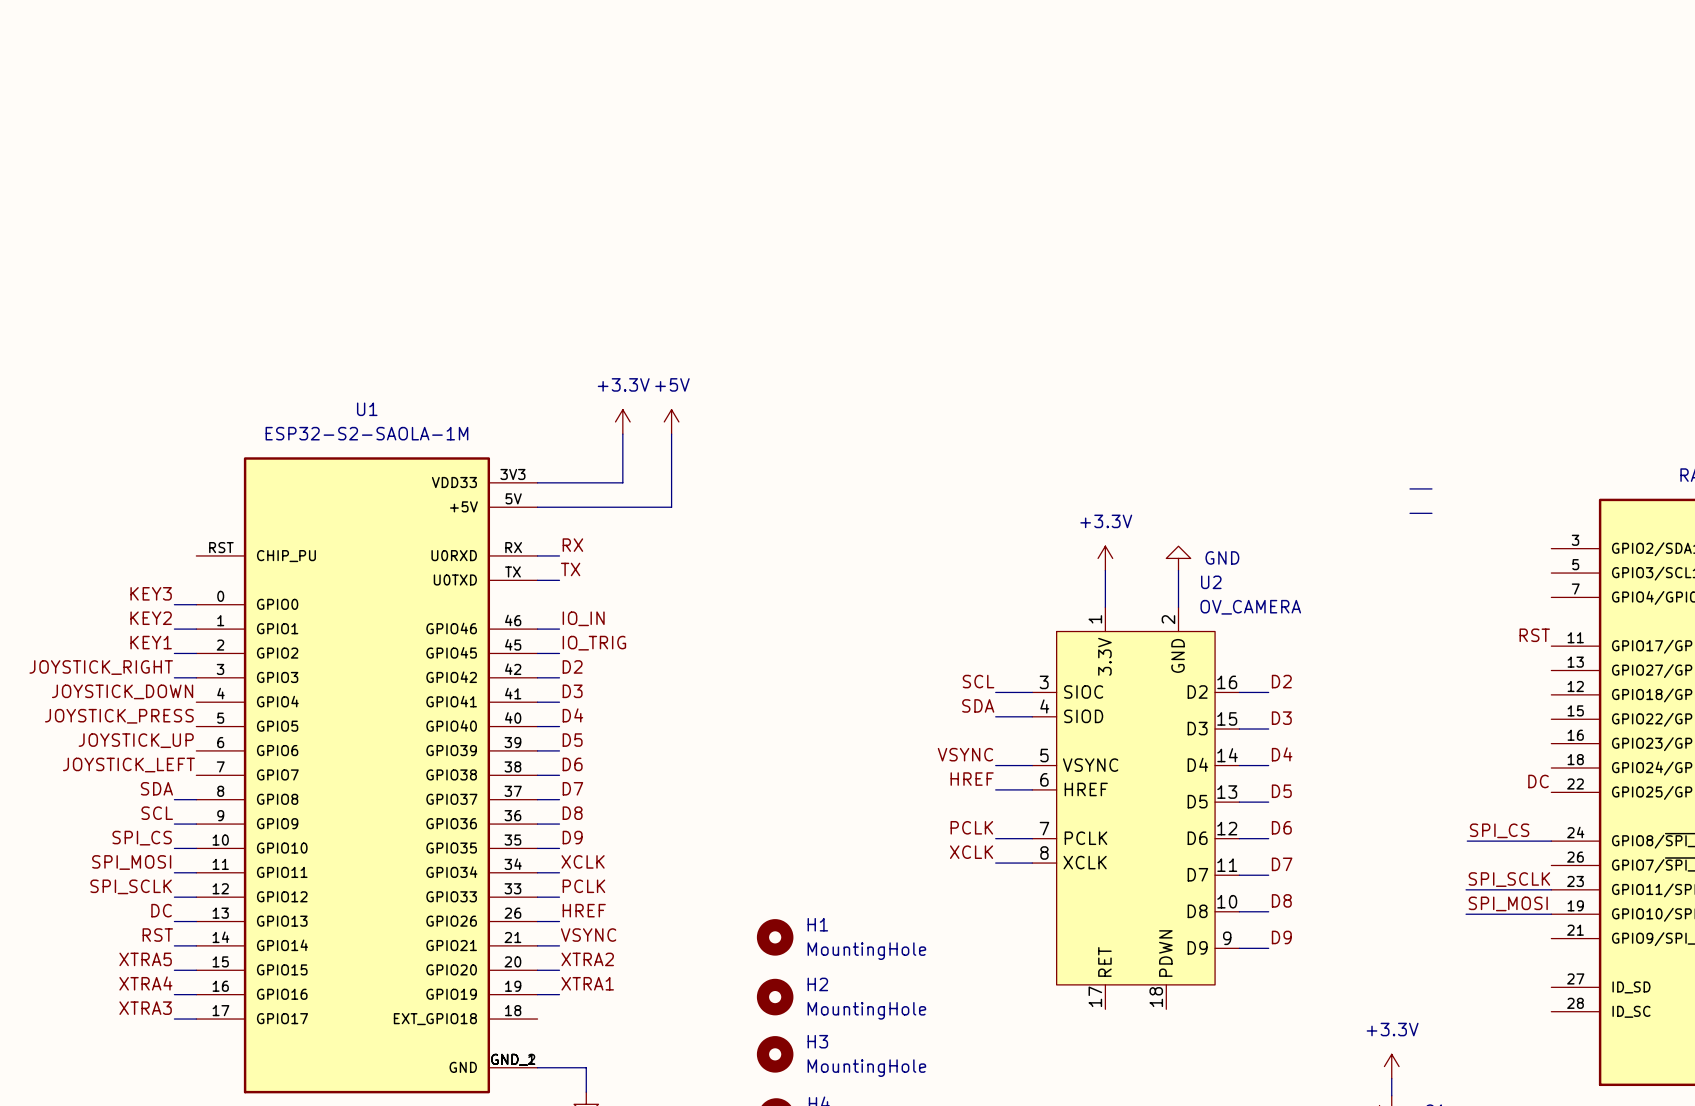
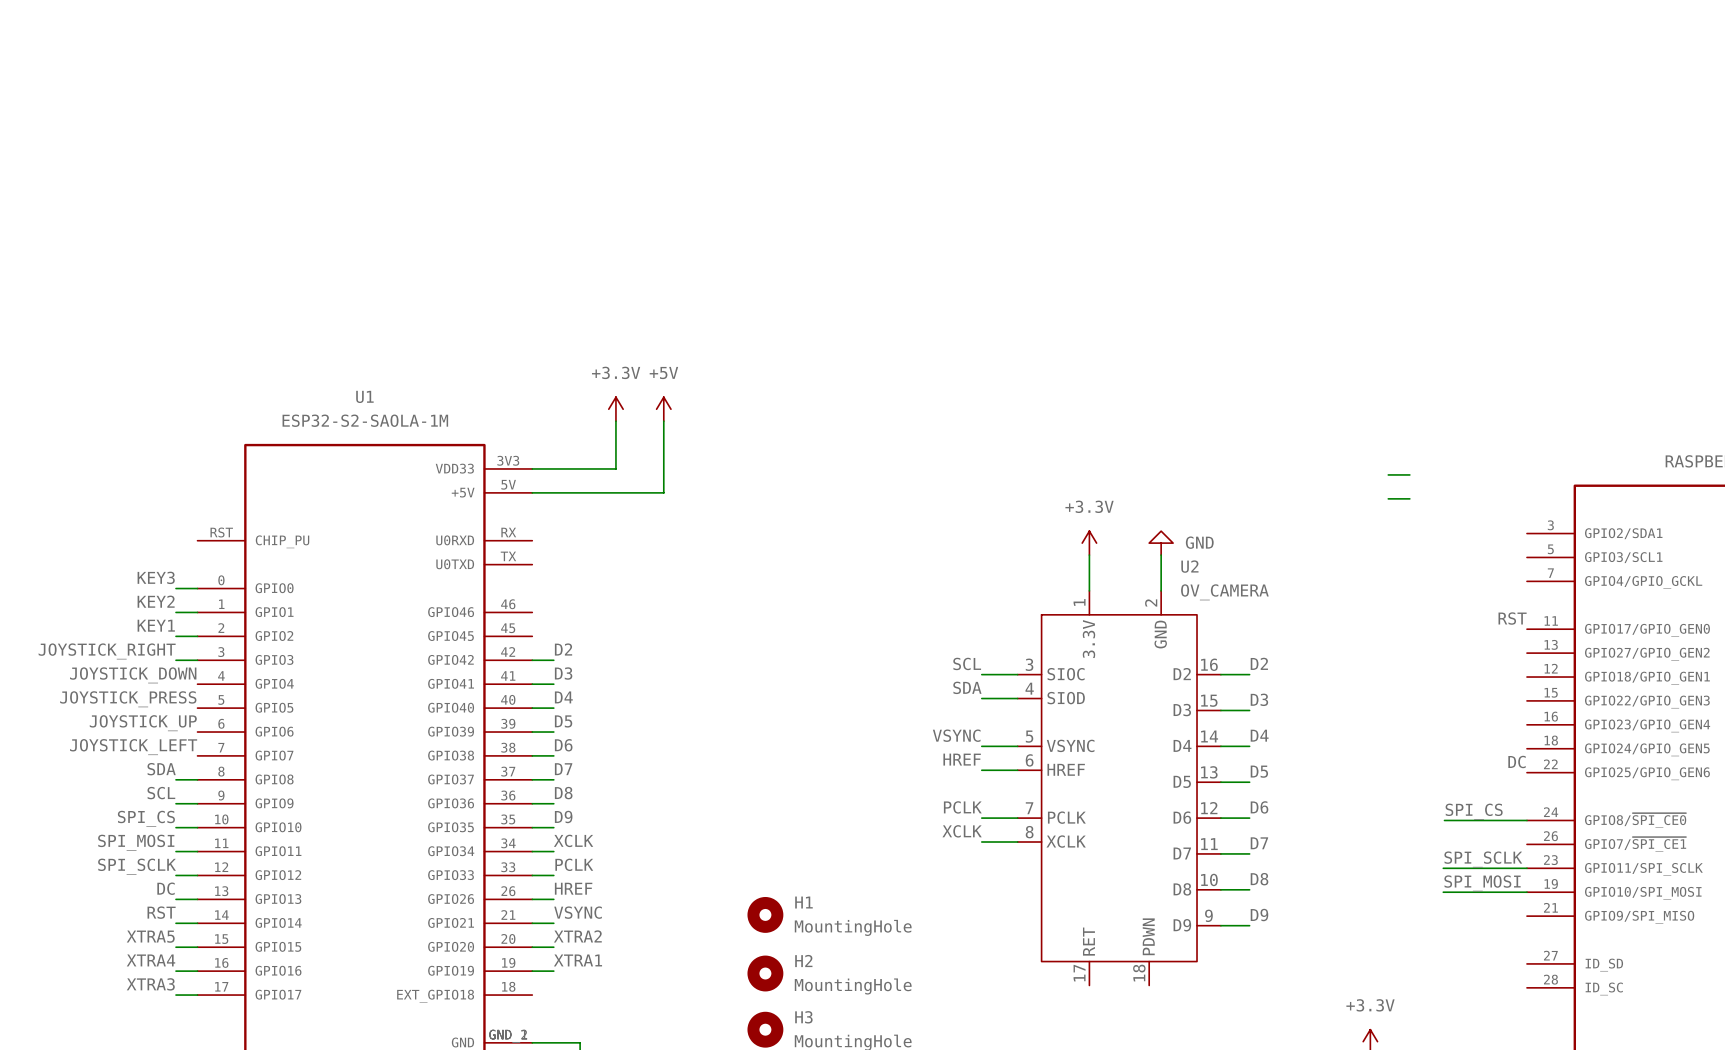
label: RX (572, 545) -> none
wire: (537, 555) (559, 555) -> none
label: TX (570, 569) -> none
wire: (537, 580) (559, 580) -> none
label: IO_IN (583, 618) -> none
wire: (537, 629) (559, 629) -> none
label: IO_TRIG (594, 643) -> none
wire: (537, 653) (559, 653) -> none

